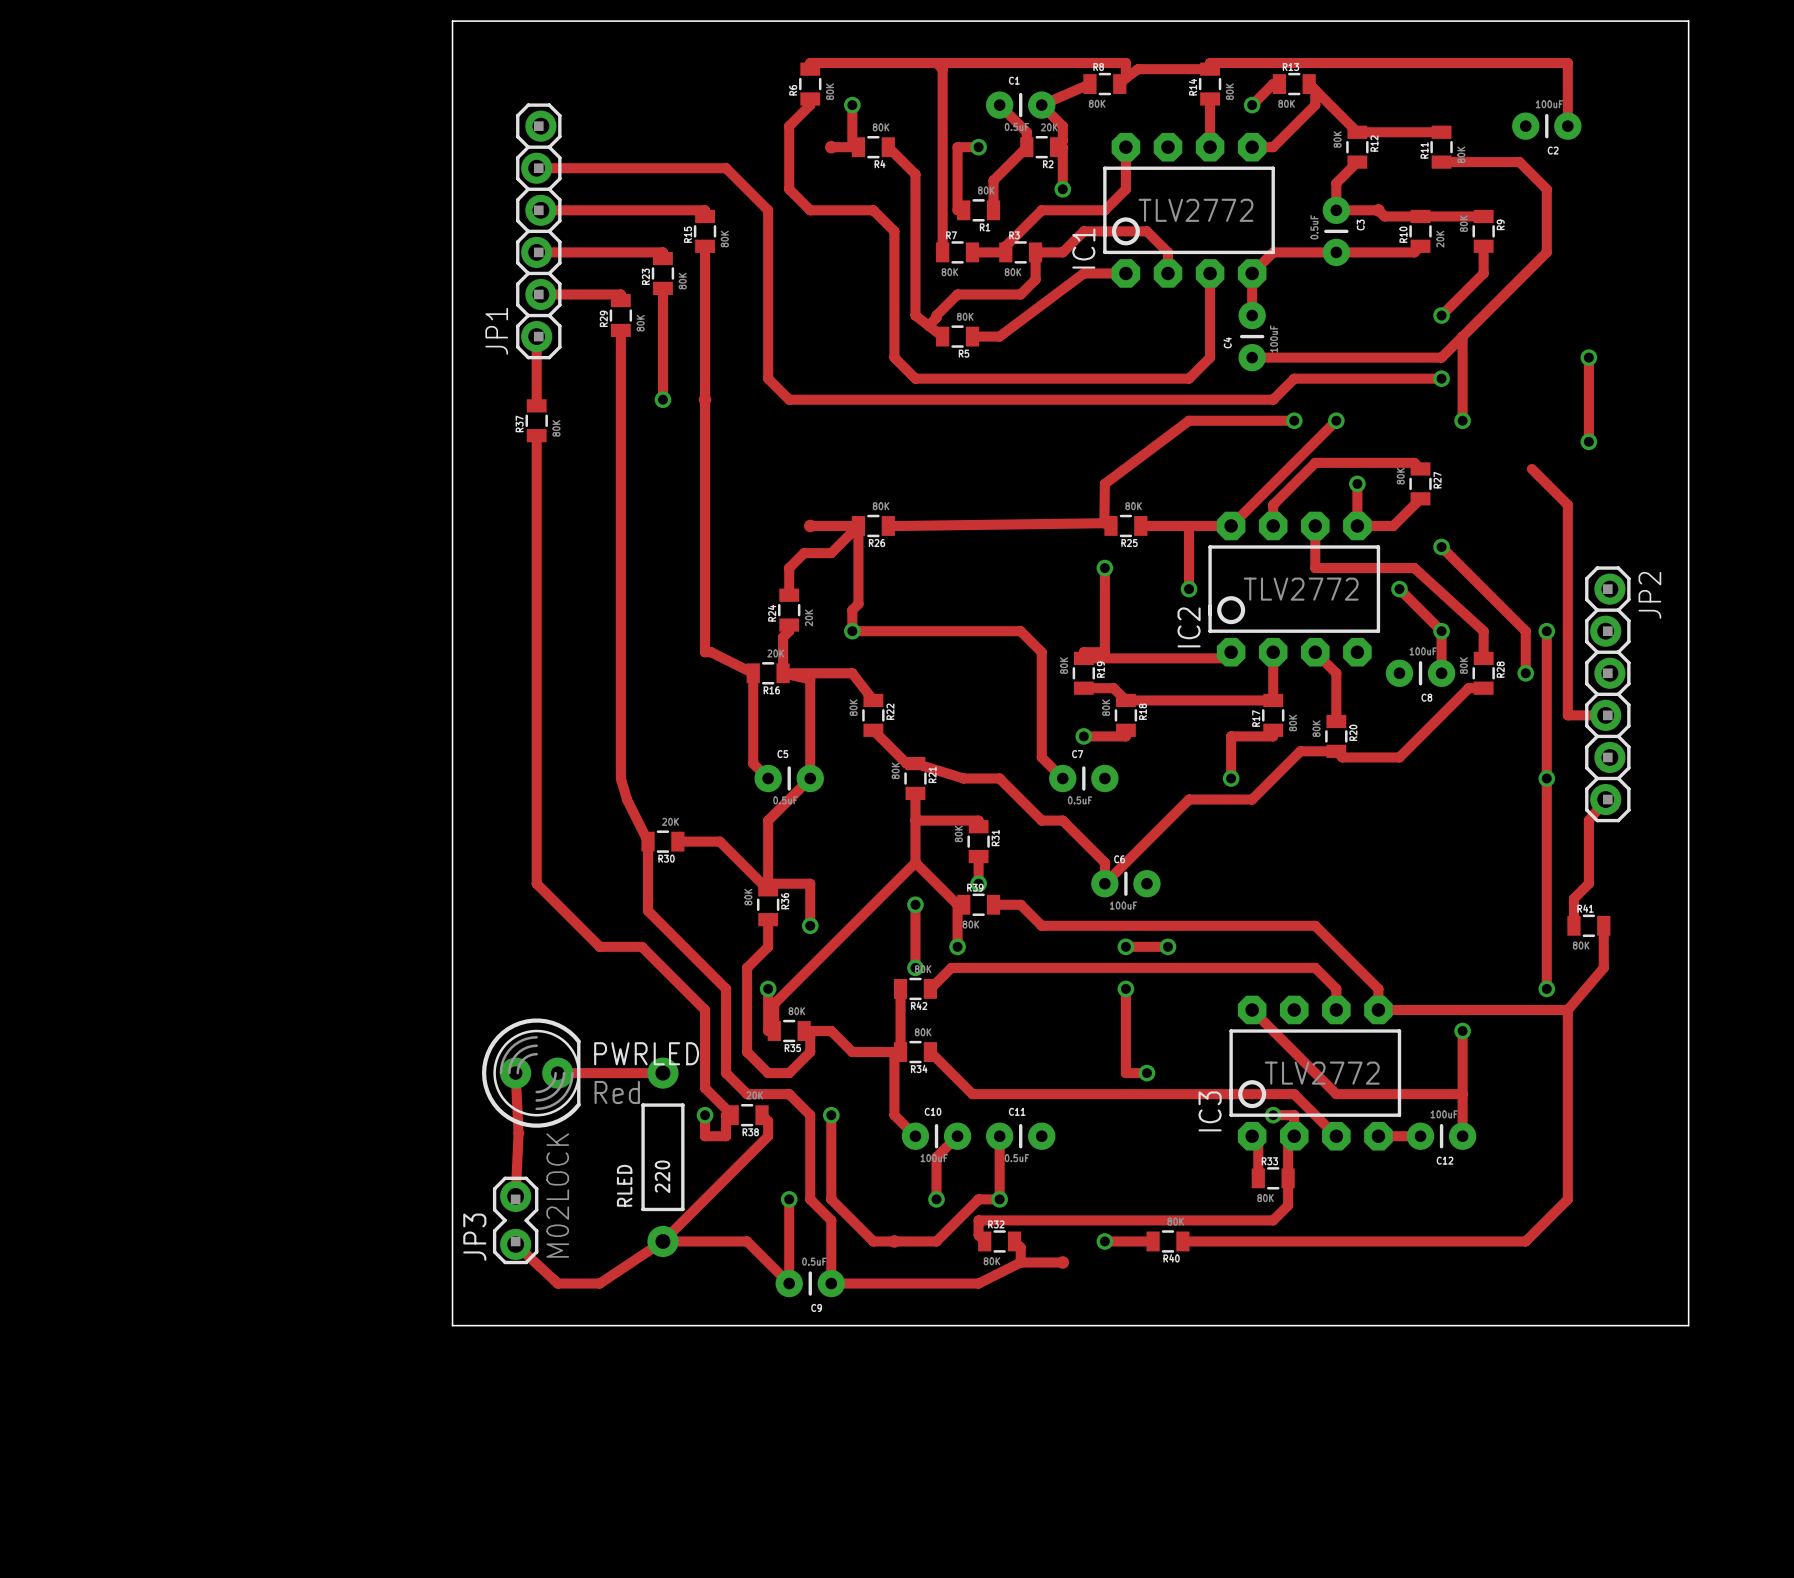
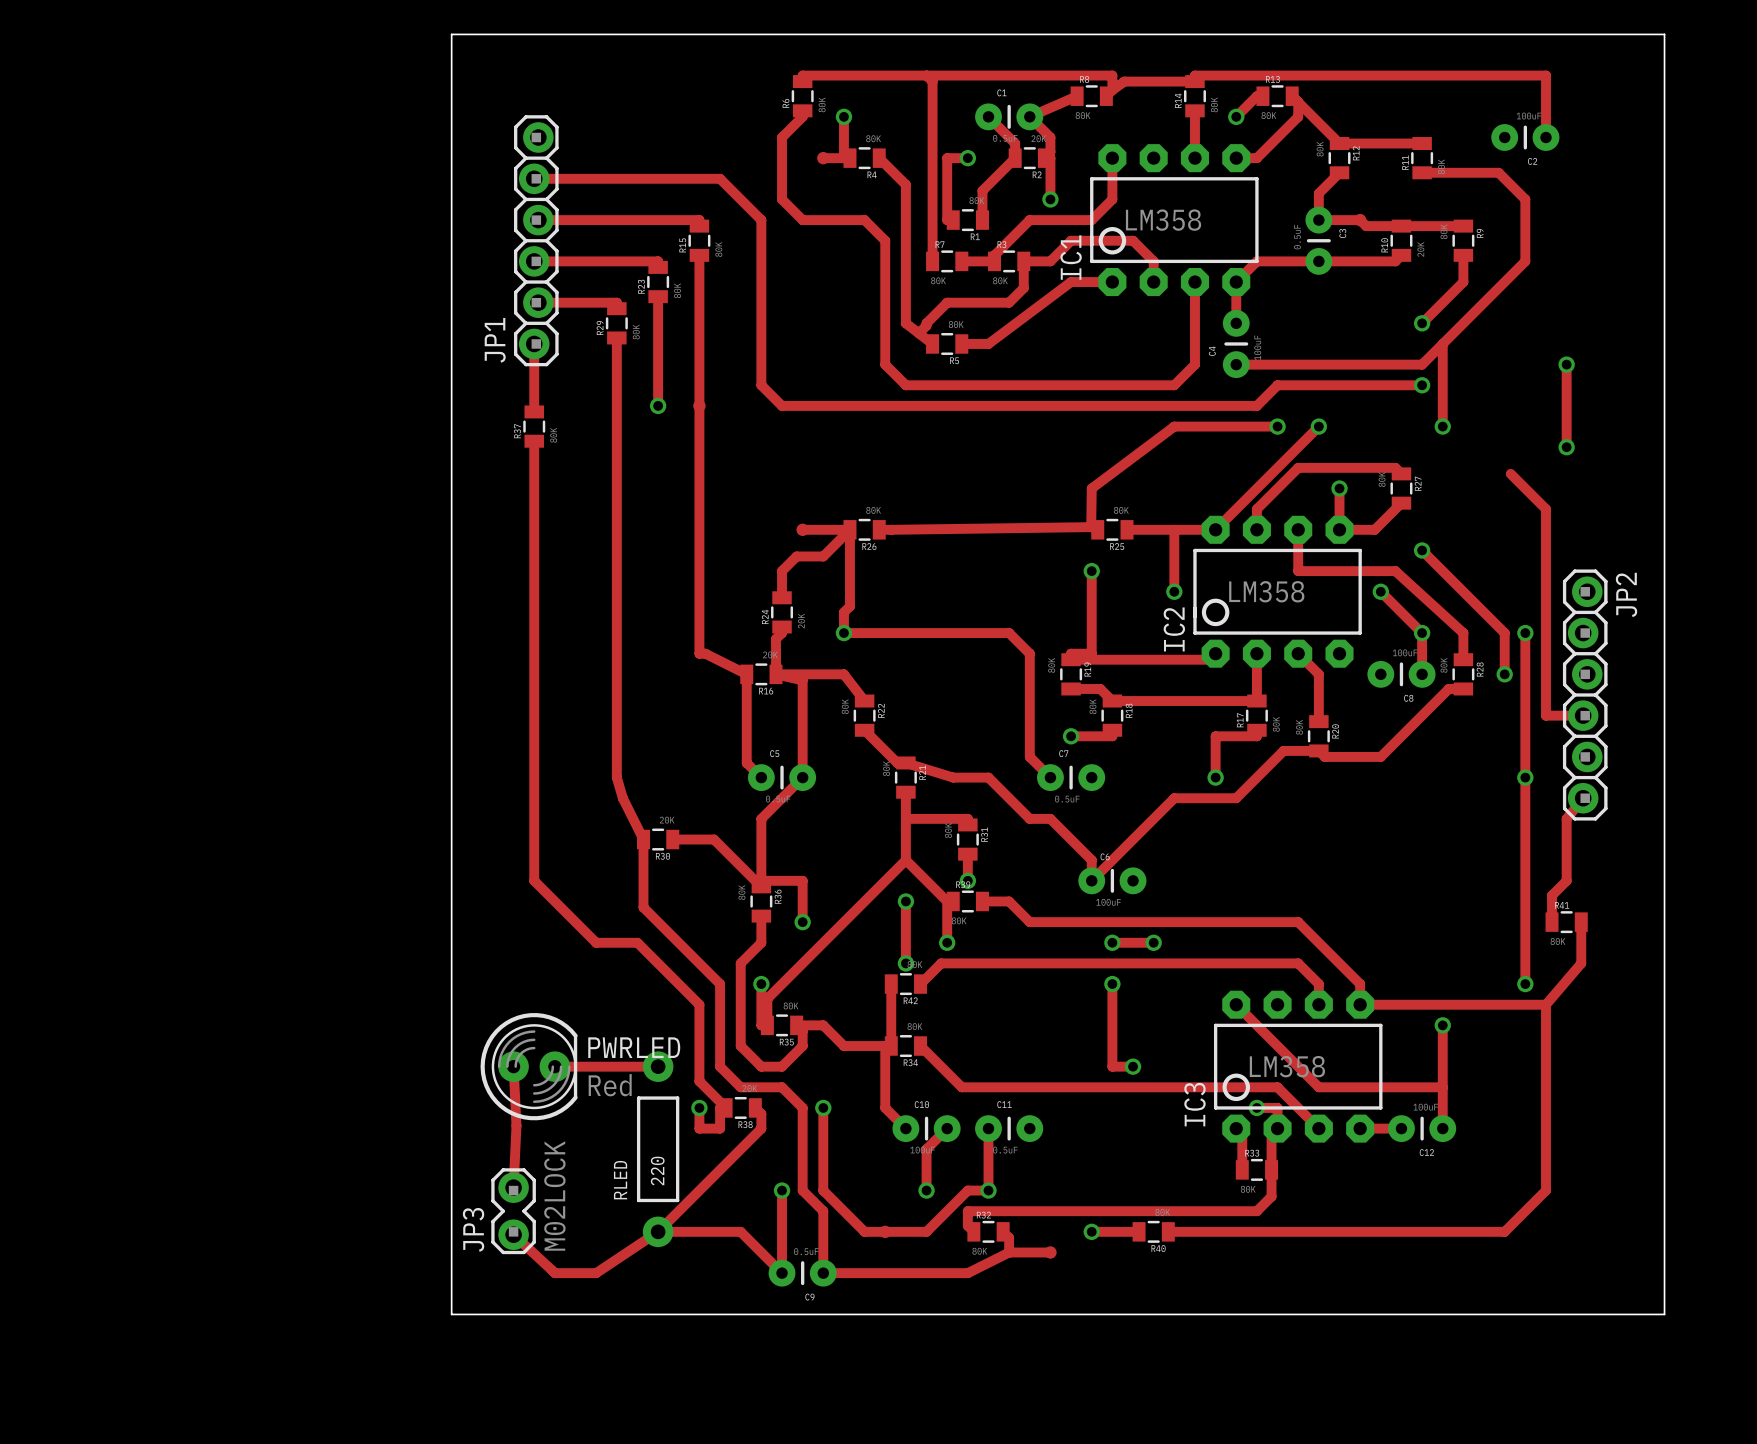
IC1 value: TLV2772 (1195, 210) -> LM358 (1163, 220)
IC2 value: TLV2772 (1301, 589) -> LM358 (1266, 591)
IC3 value: TLV2772 (1322, 1073) -> LM358 (1287, 1066)

